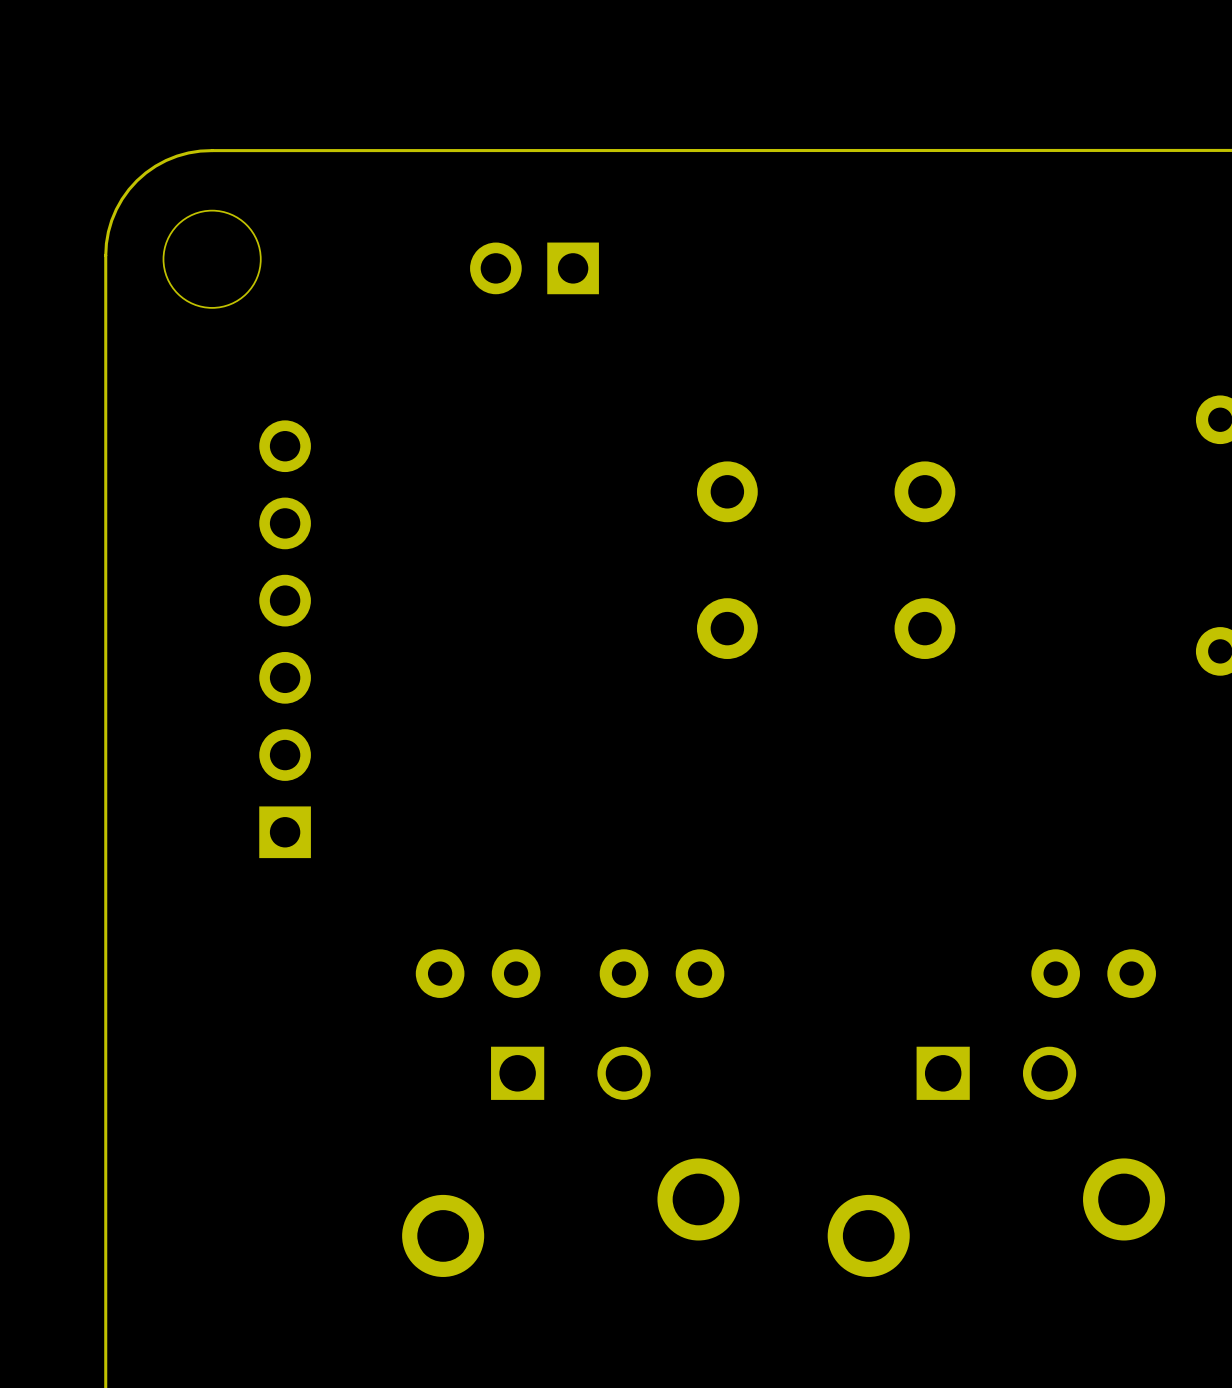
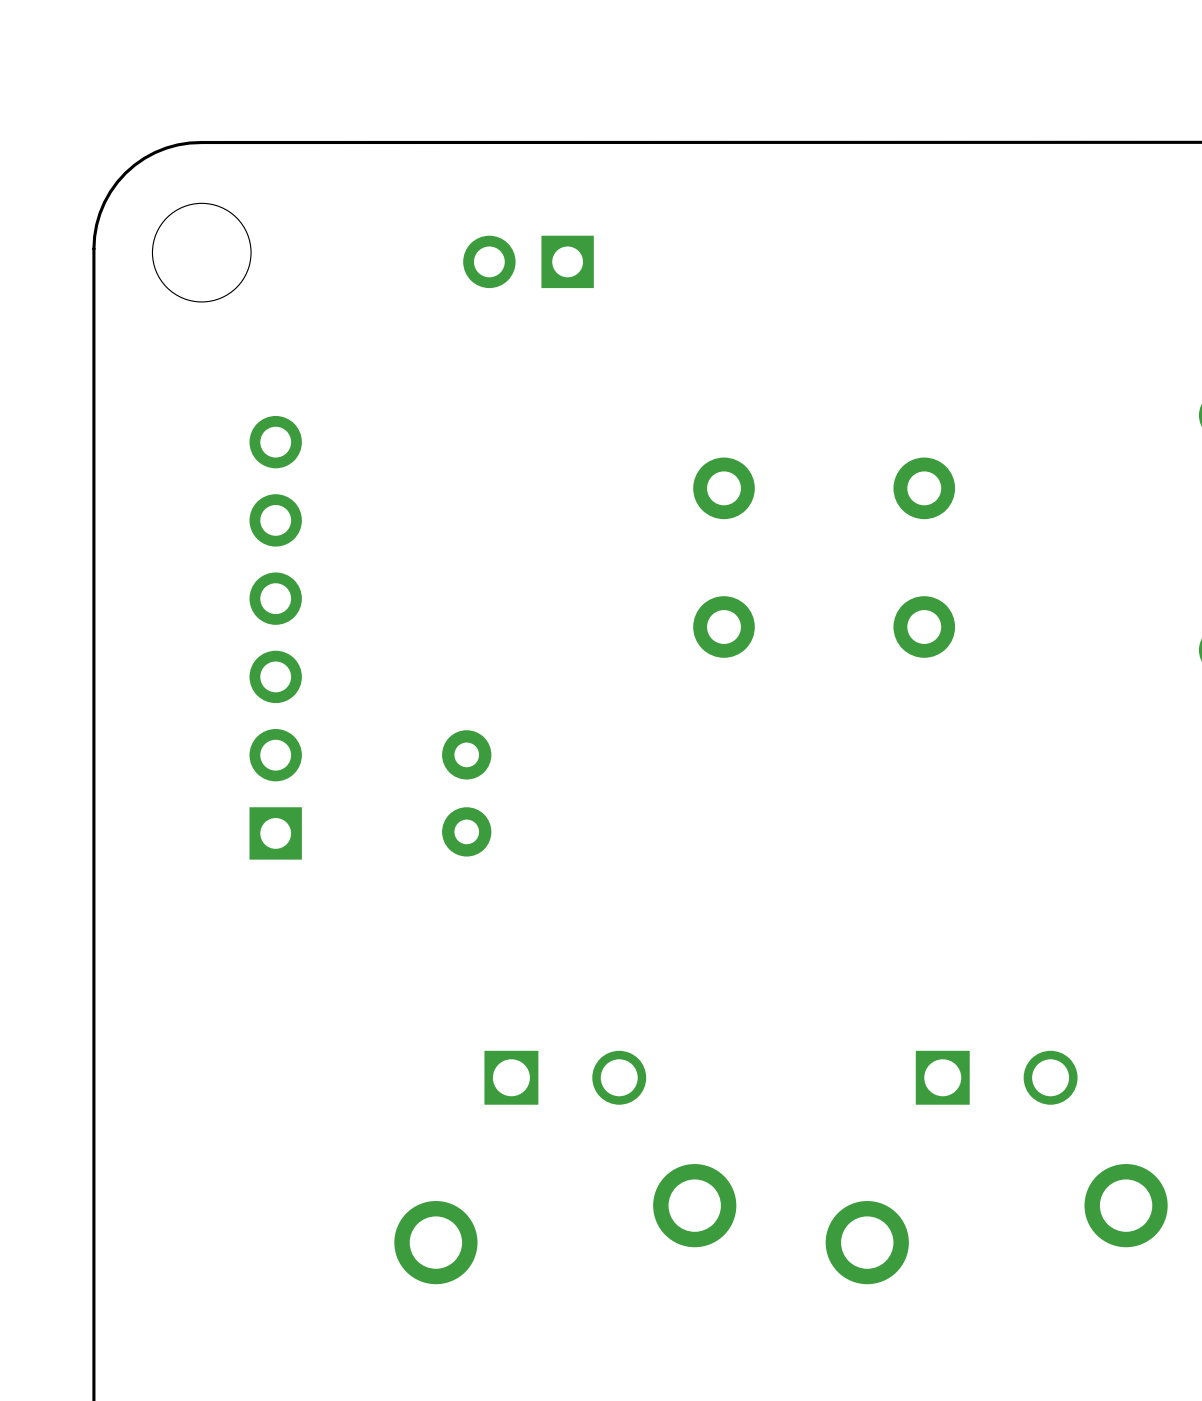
part: none -> (466, 793)
part: (478, 973) -> none
part: (662, 973) -> none
part: (1093, 973) -> none

